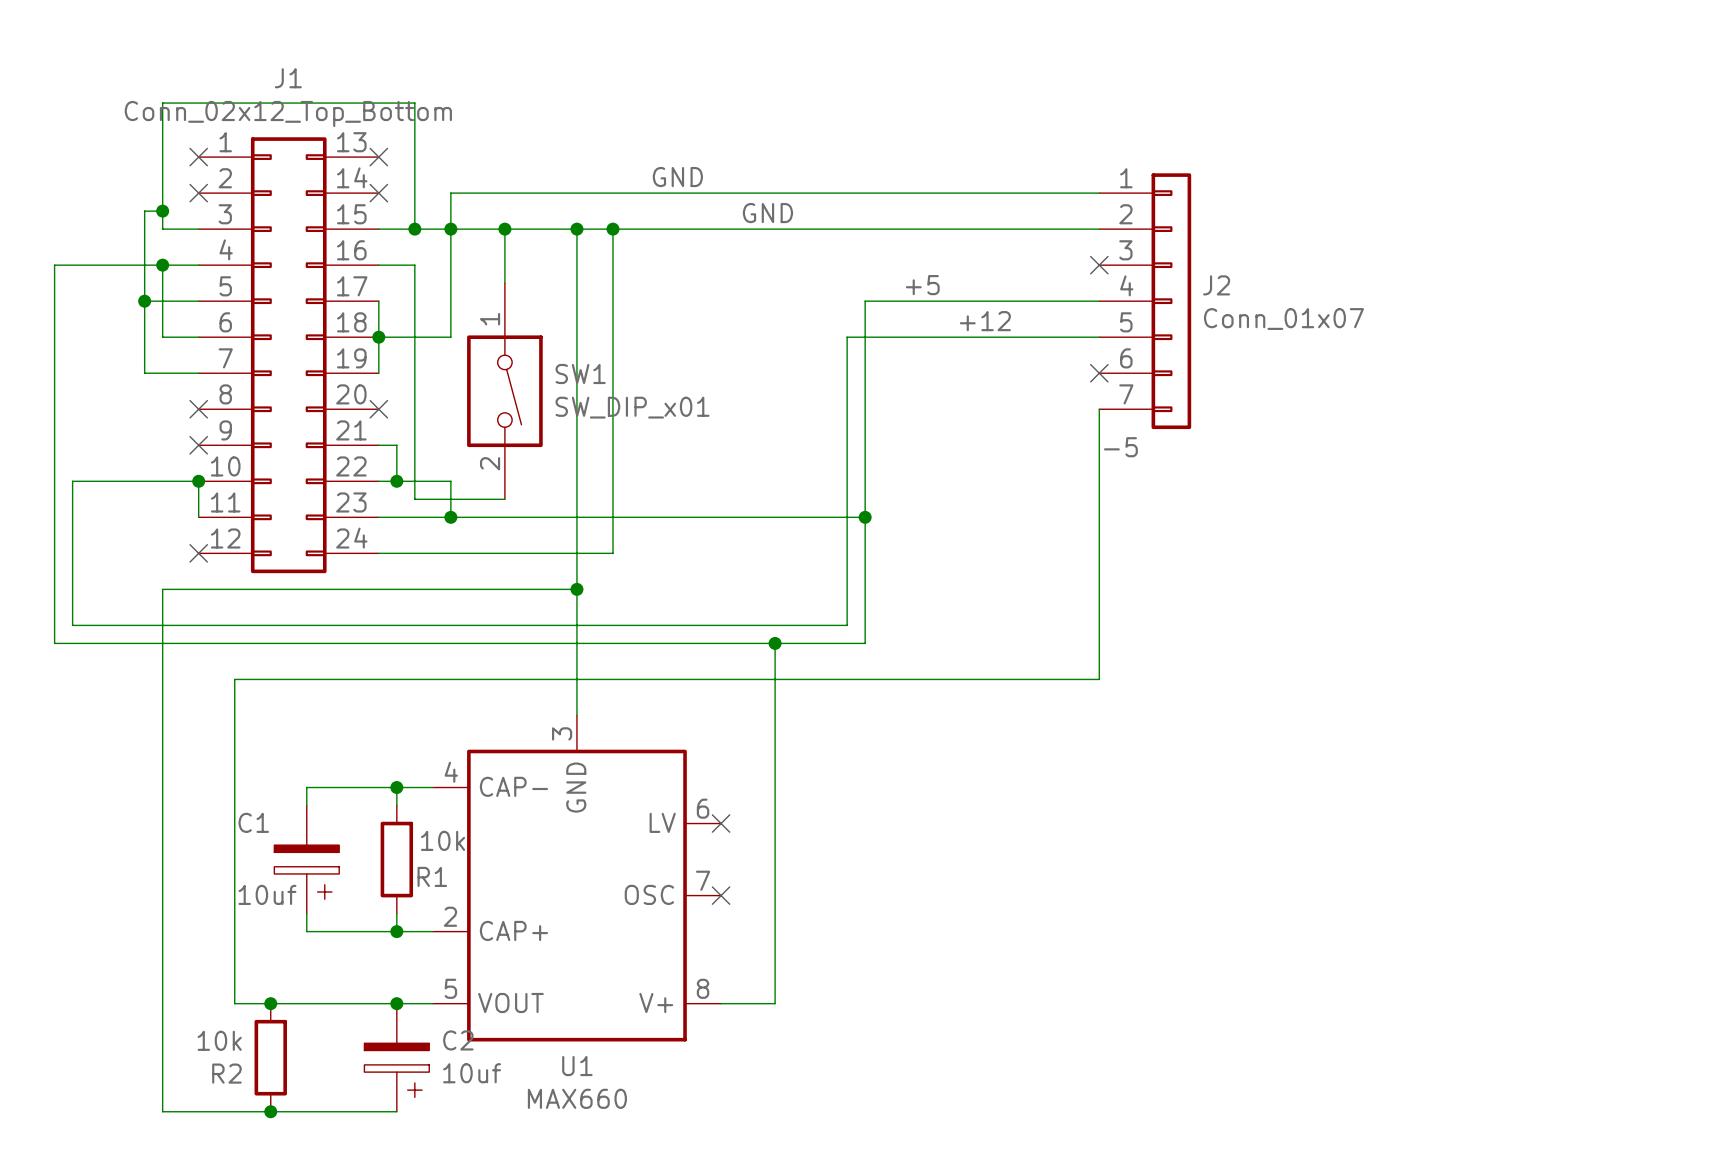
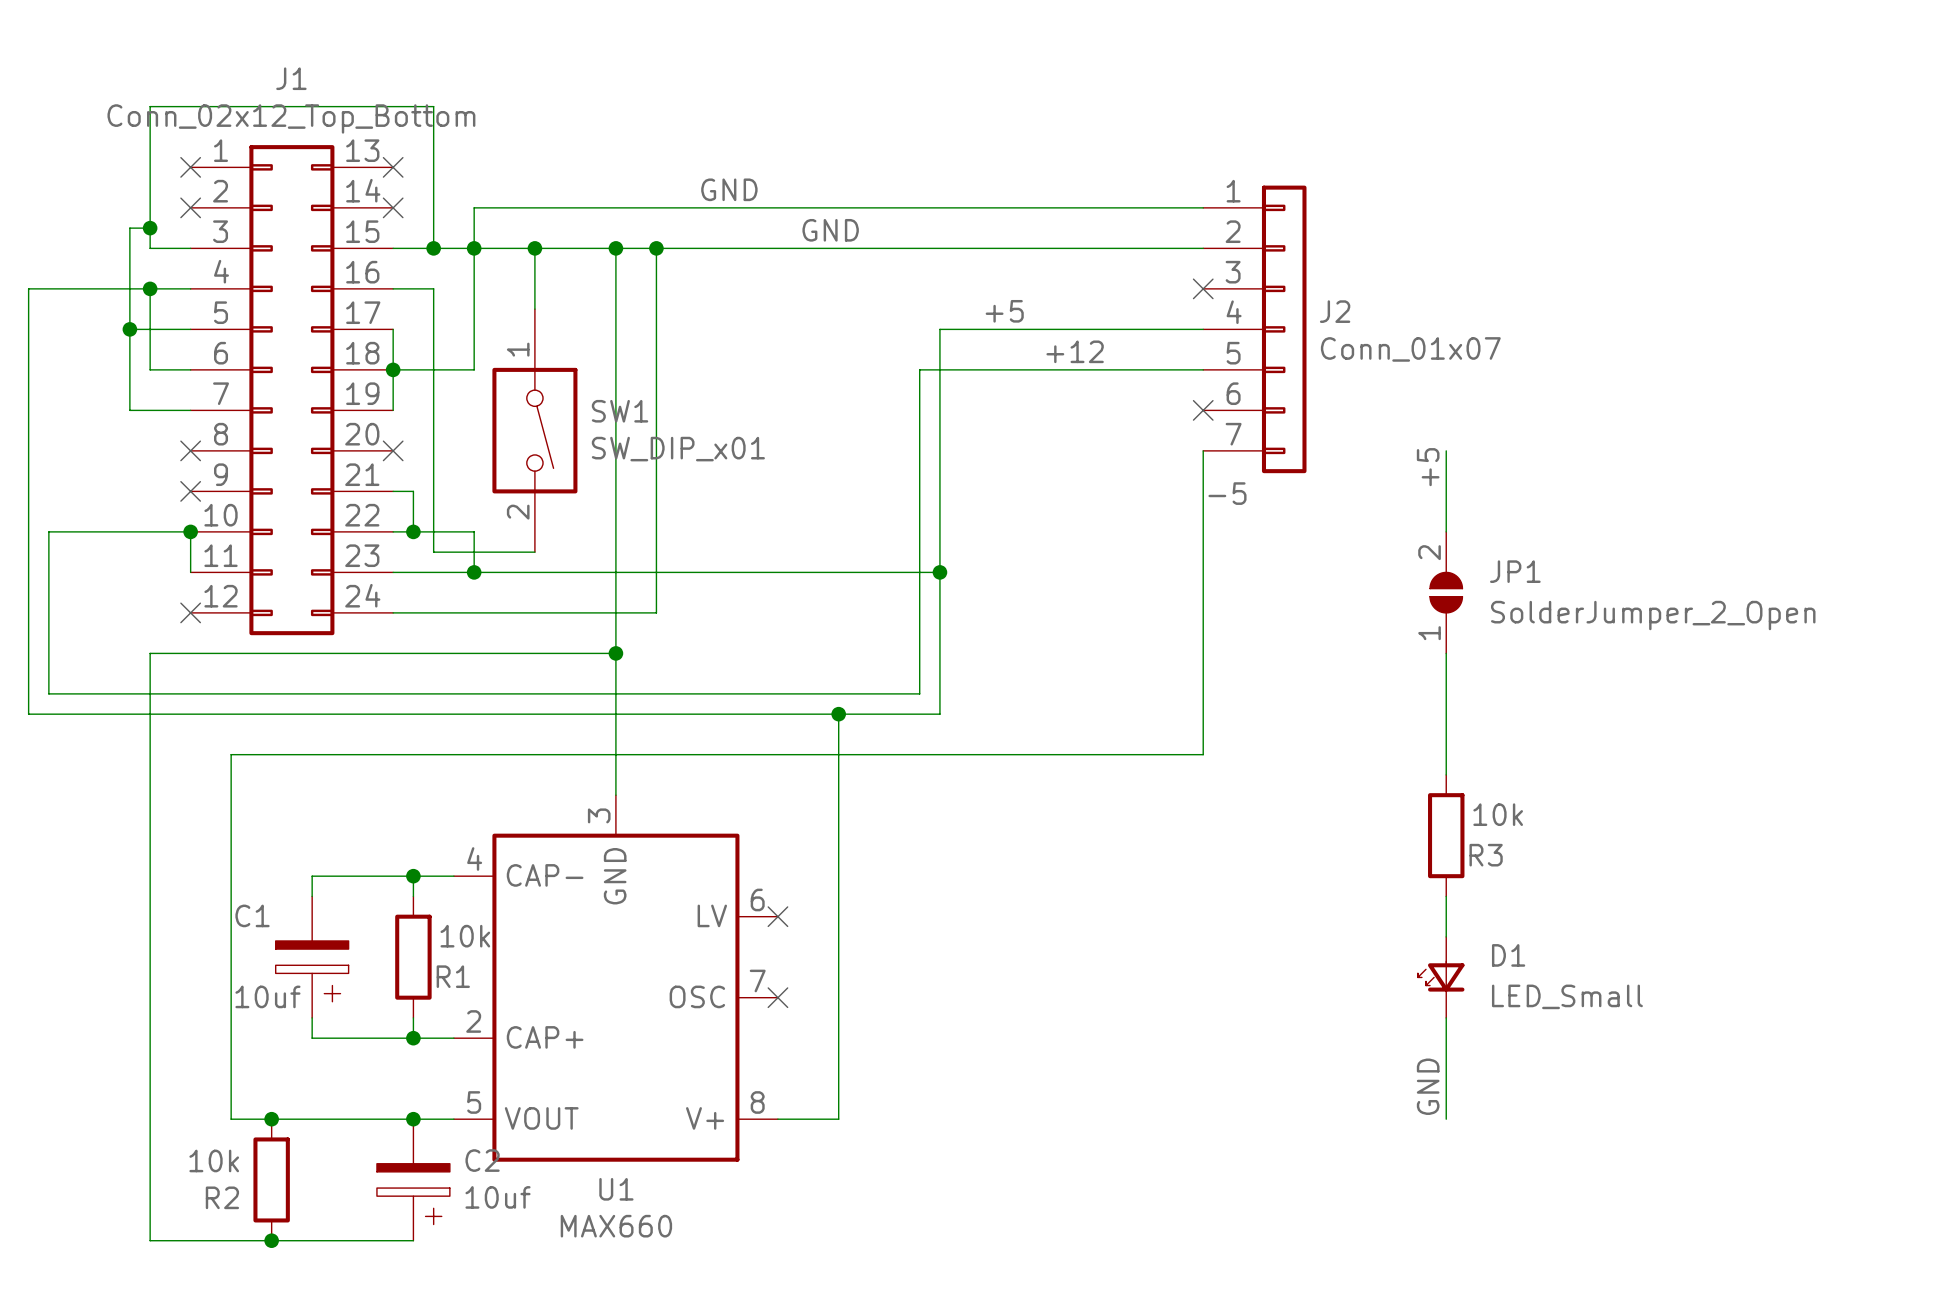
wire: none -> (1446, 450) (1446, 531)
label: none -> +5 (1428, 467)
JP1: none -> SolderJumper_2_Open (1446, 592)
wire: none -> (1446, 653) (1446, 774)
R3: none -> 10k (1446, 835)
wire: none -> (1446, 896) (1446, 936)
D1: none -> LED_Small (1441, 977)
wire: none -> (1446, 1017) (1446, 1119)
label: none -> GND (1428, 1086)

